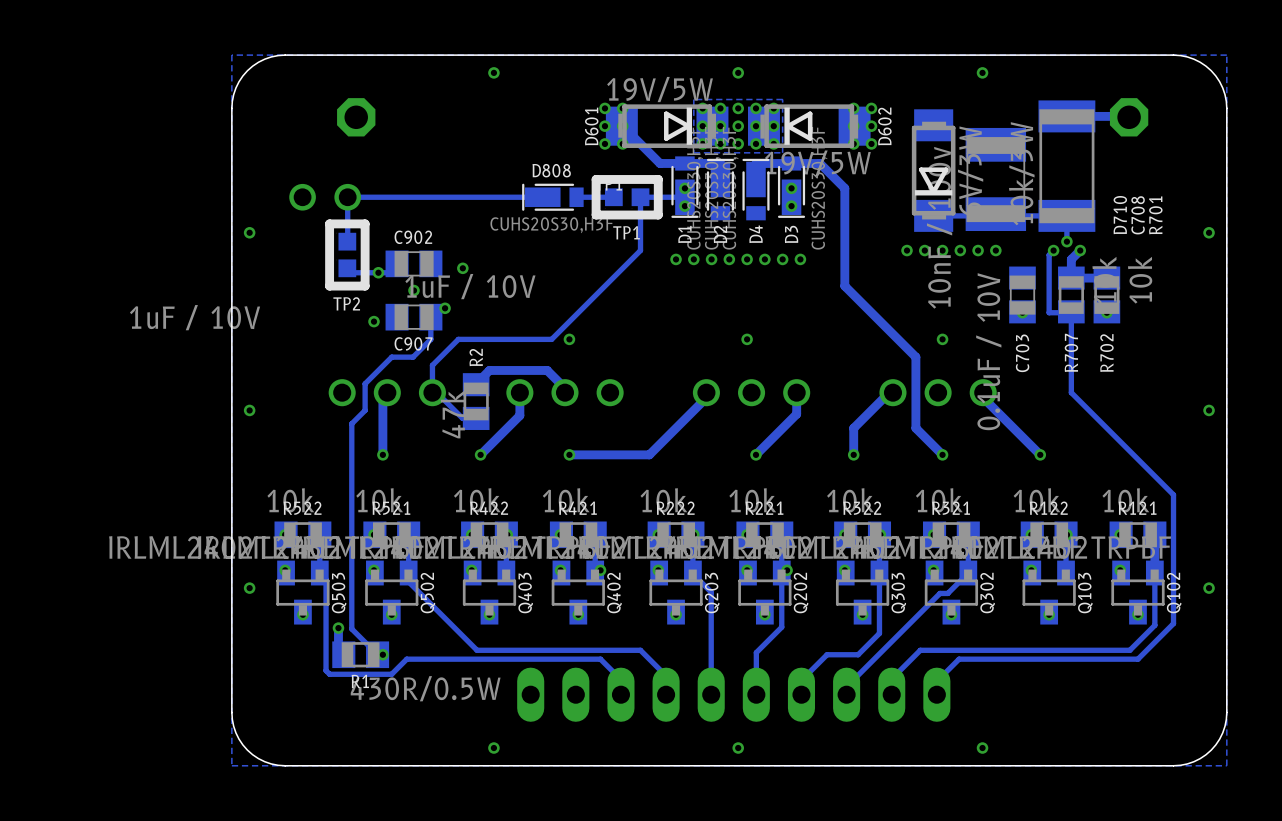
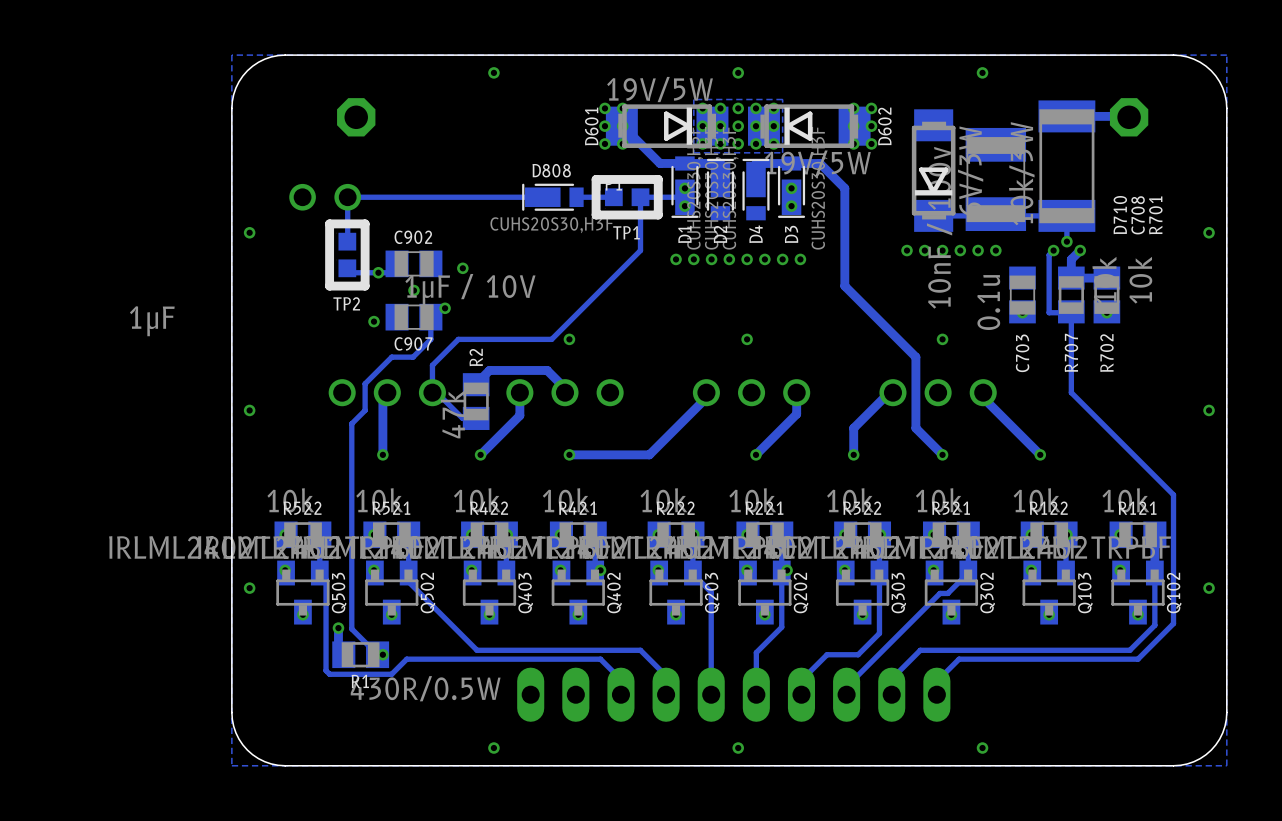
C902 value: 1uF / 10V (470, 286) -> 1μF / 10V (470, 289)
C907 value: 1uF / 10V (195, 317) -> 1μF (152, 321)
C703 value: 0.1uF / 10V (988, 351) -> 0.1u (988, 302)

